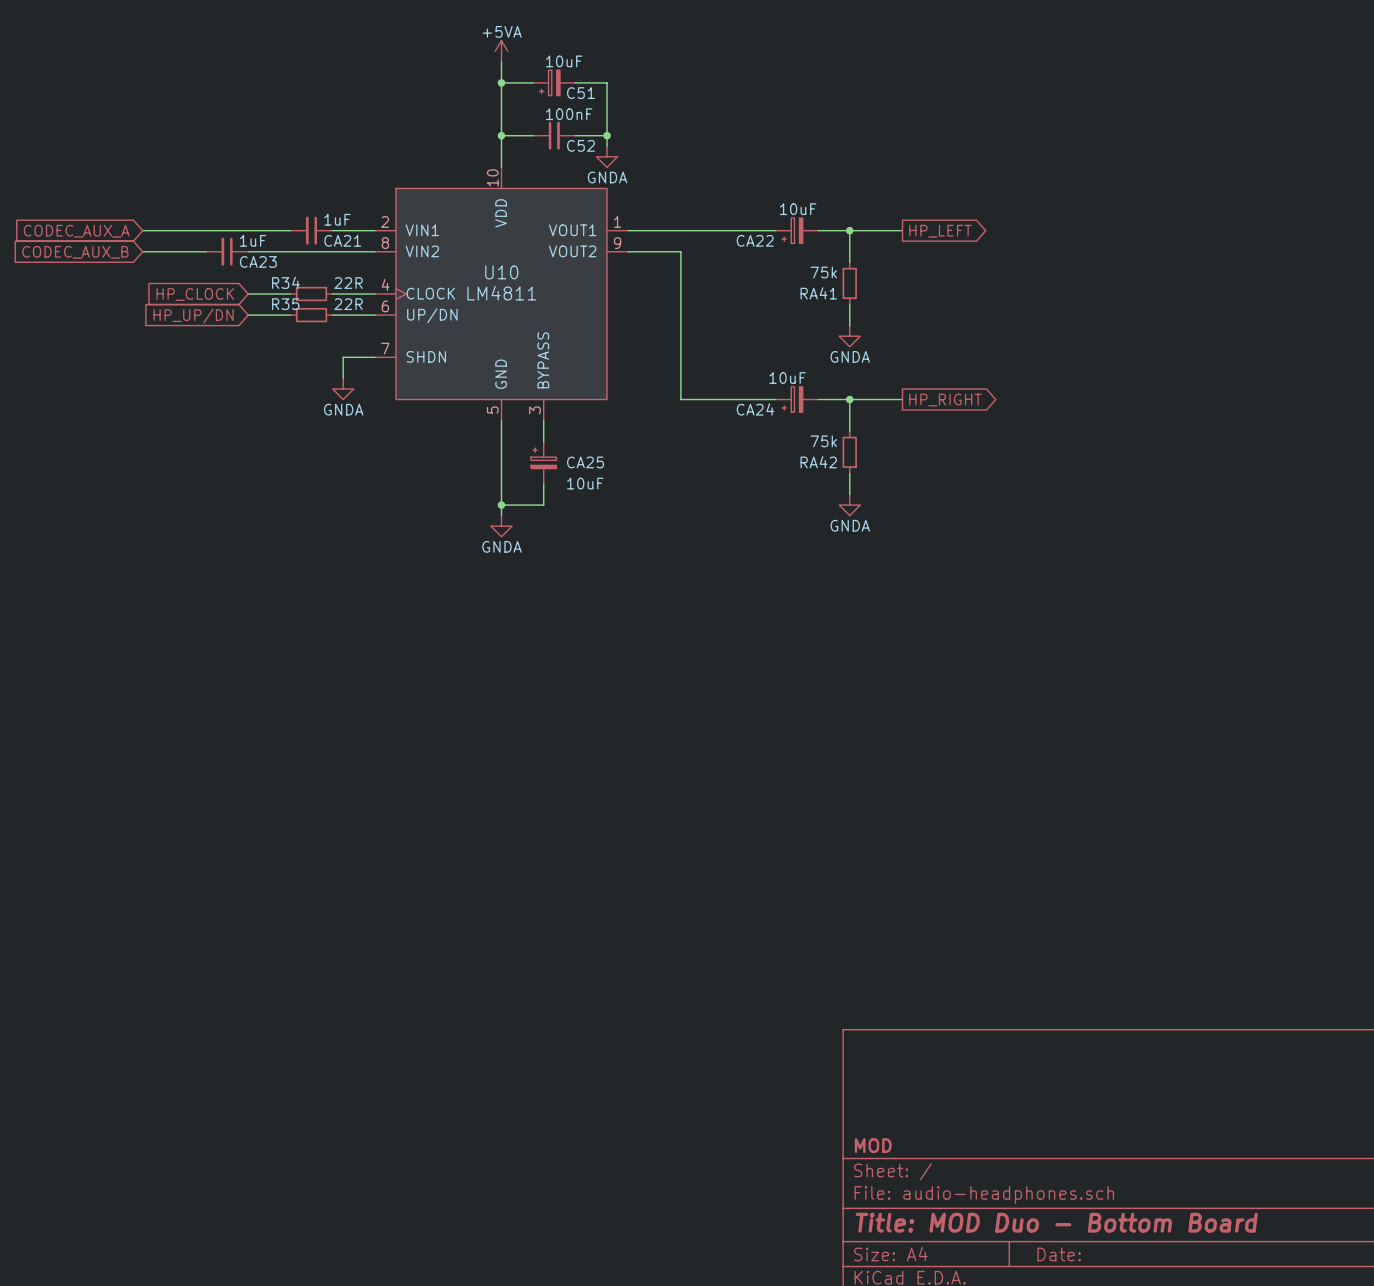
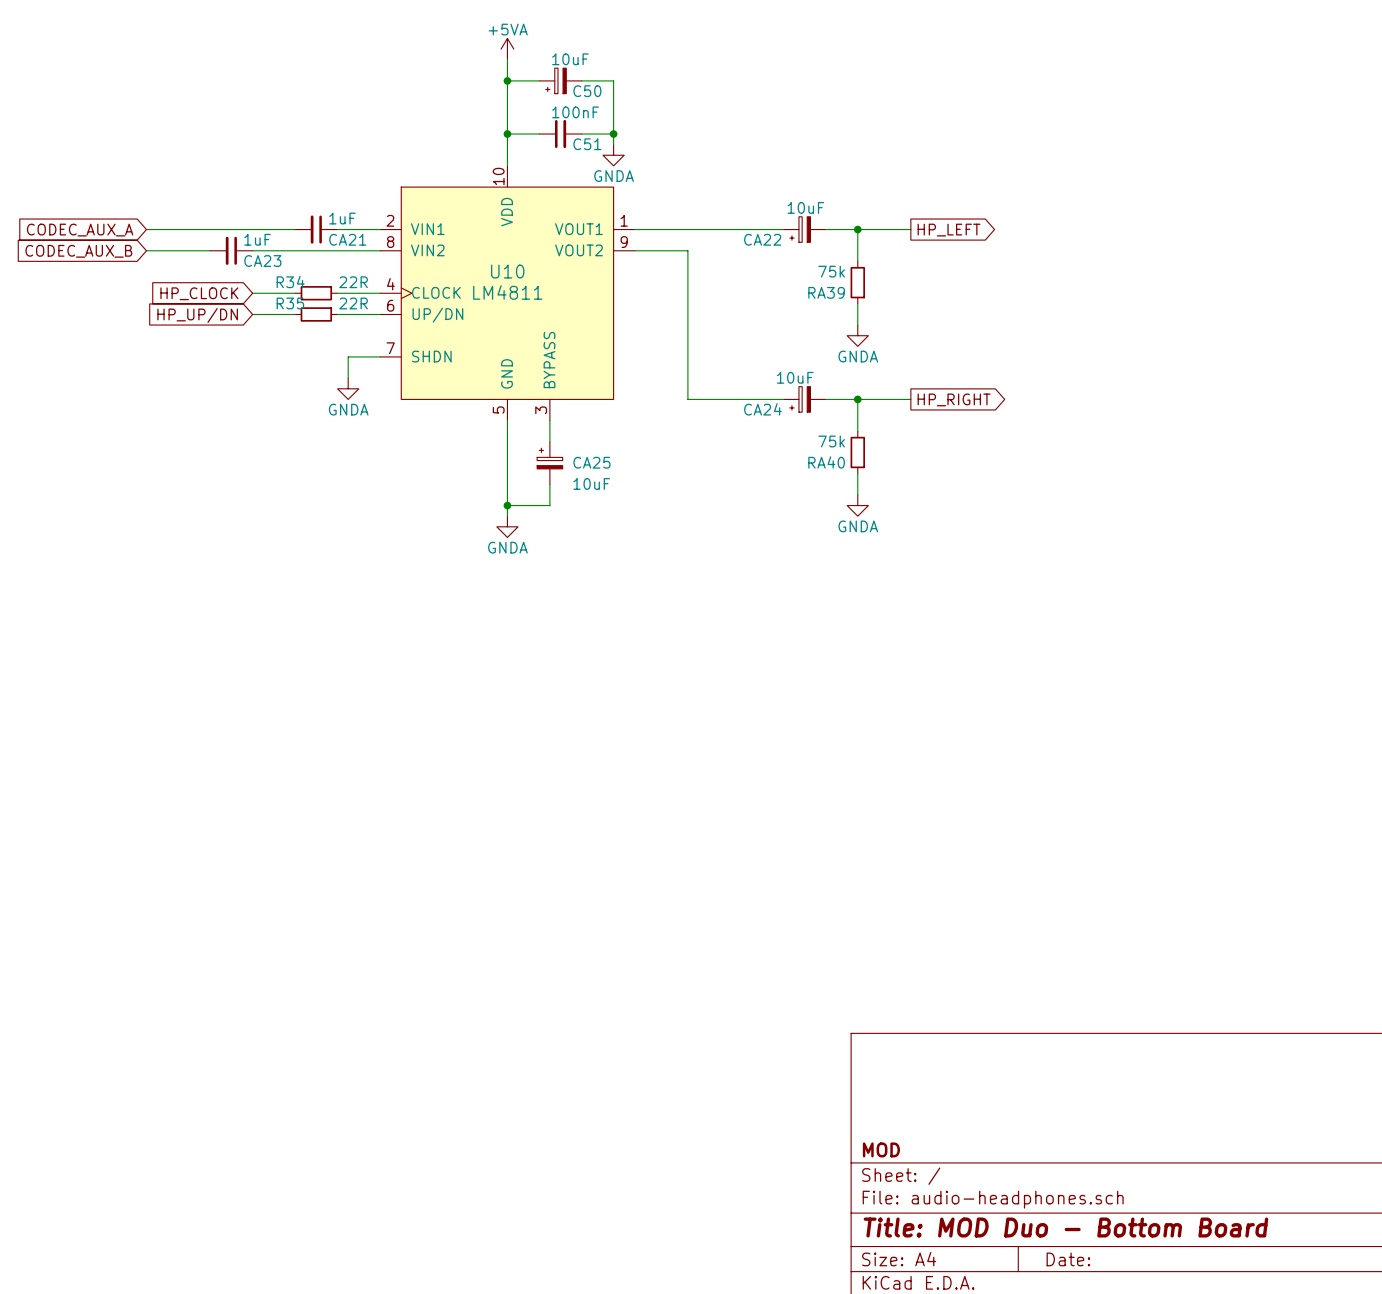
C51 name: C51 (580, 93) -> C50 (587, 91)
C52 name: C52 (580, 145) -> C51 (587, 144)
RA41 name: RA41 (818, 293) -> RA39 (826, 292)
RA42 name: RA42 (818, 462) -> RA40 (826, 462)

